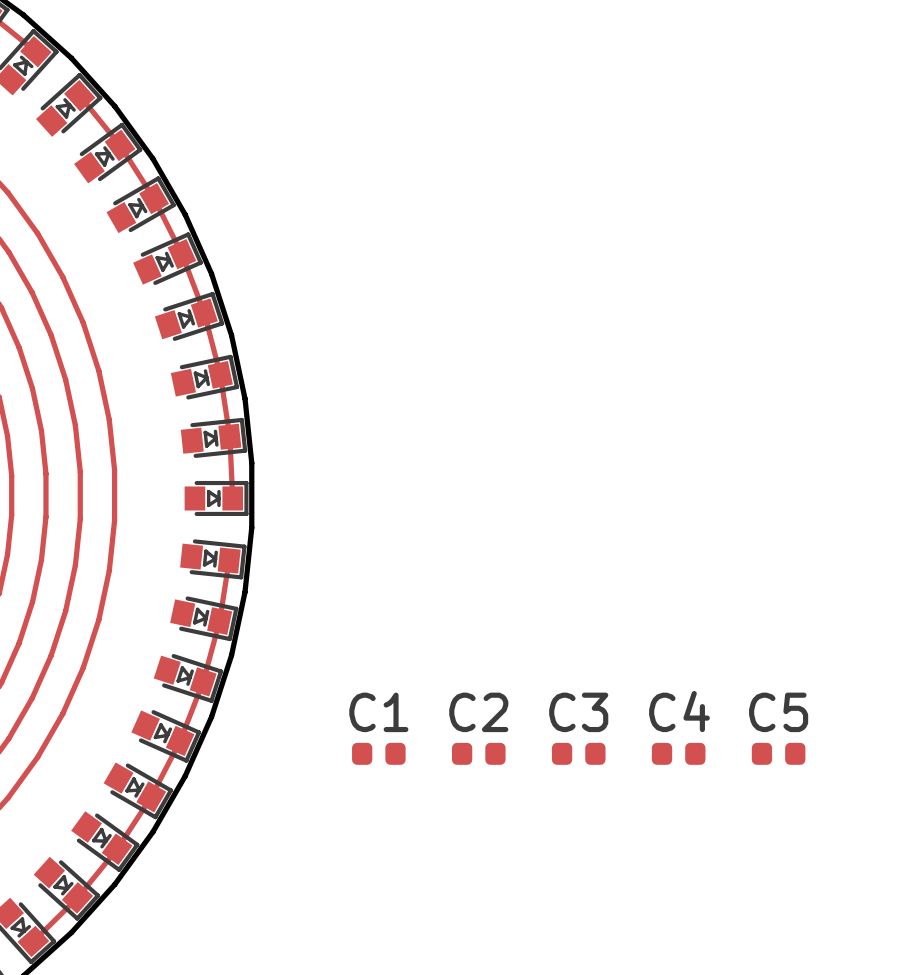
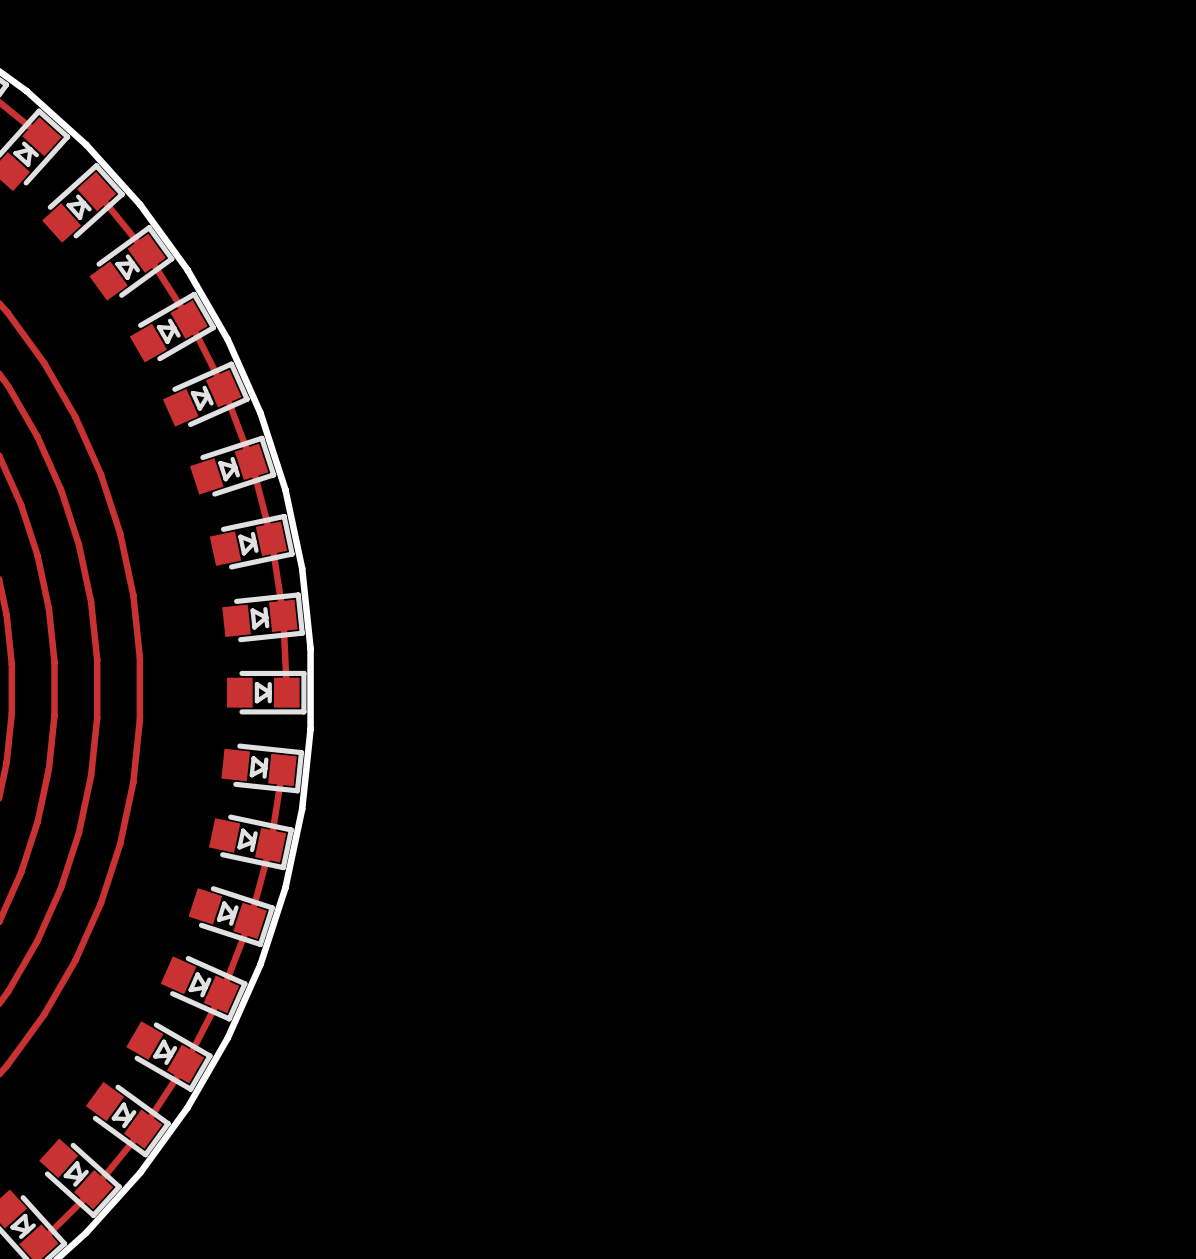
C1: (378, 753) -> none
C2: (478, 753) -> none
C3: (578, 753) -> none
C4: (678, 753) -> none
C5: (778, 753) -> none

